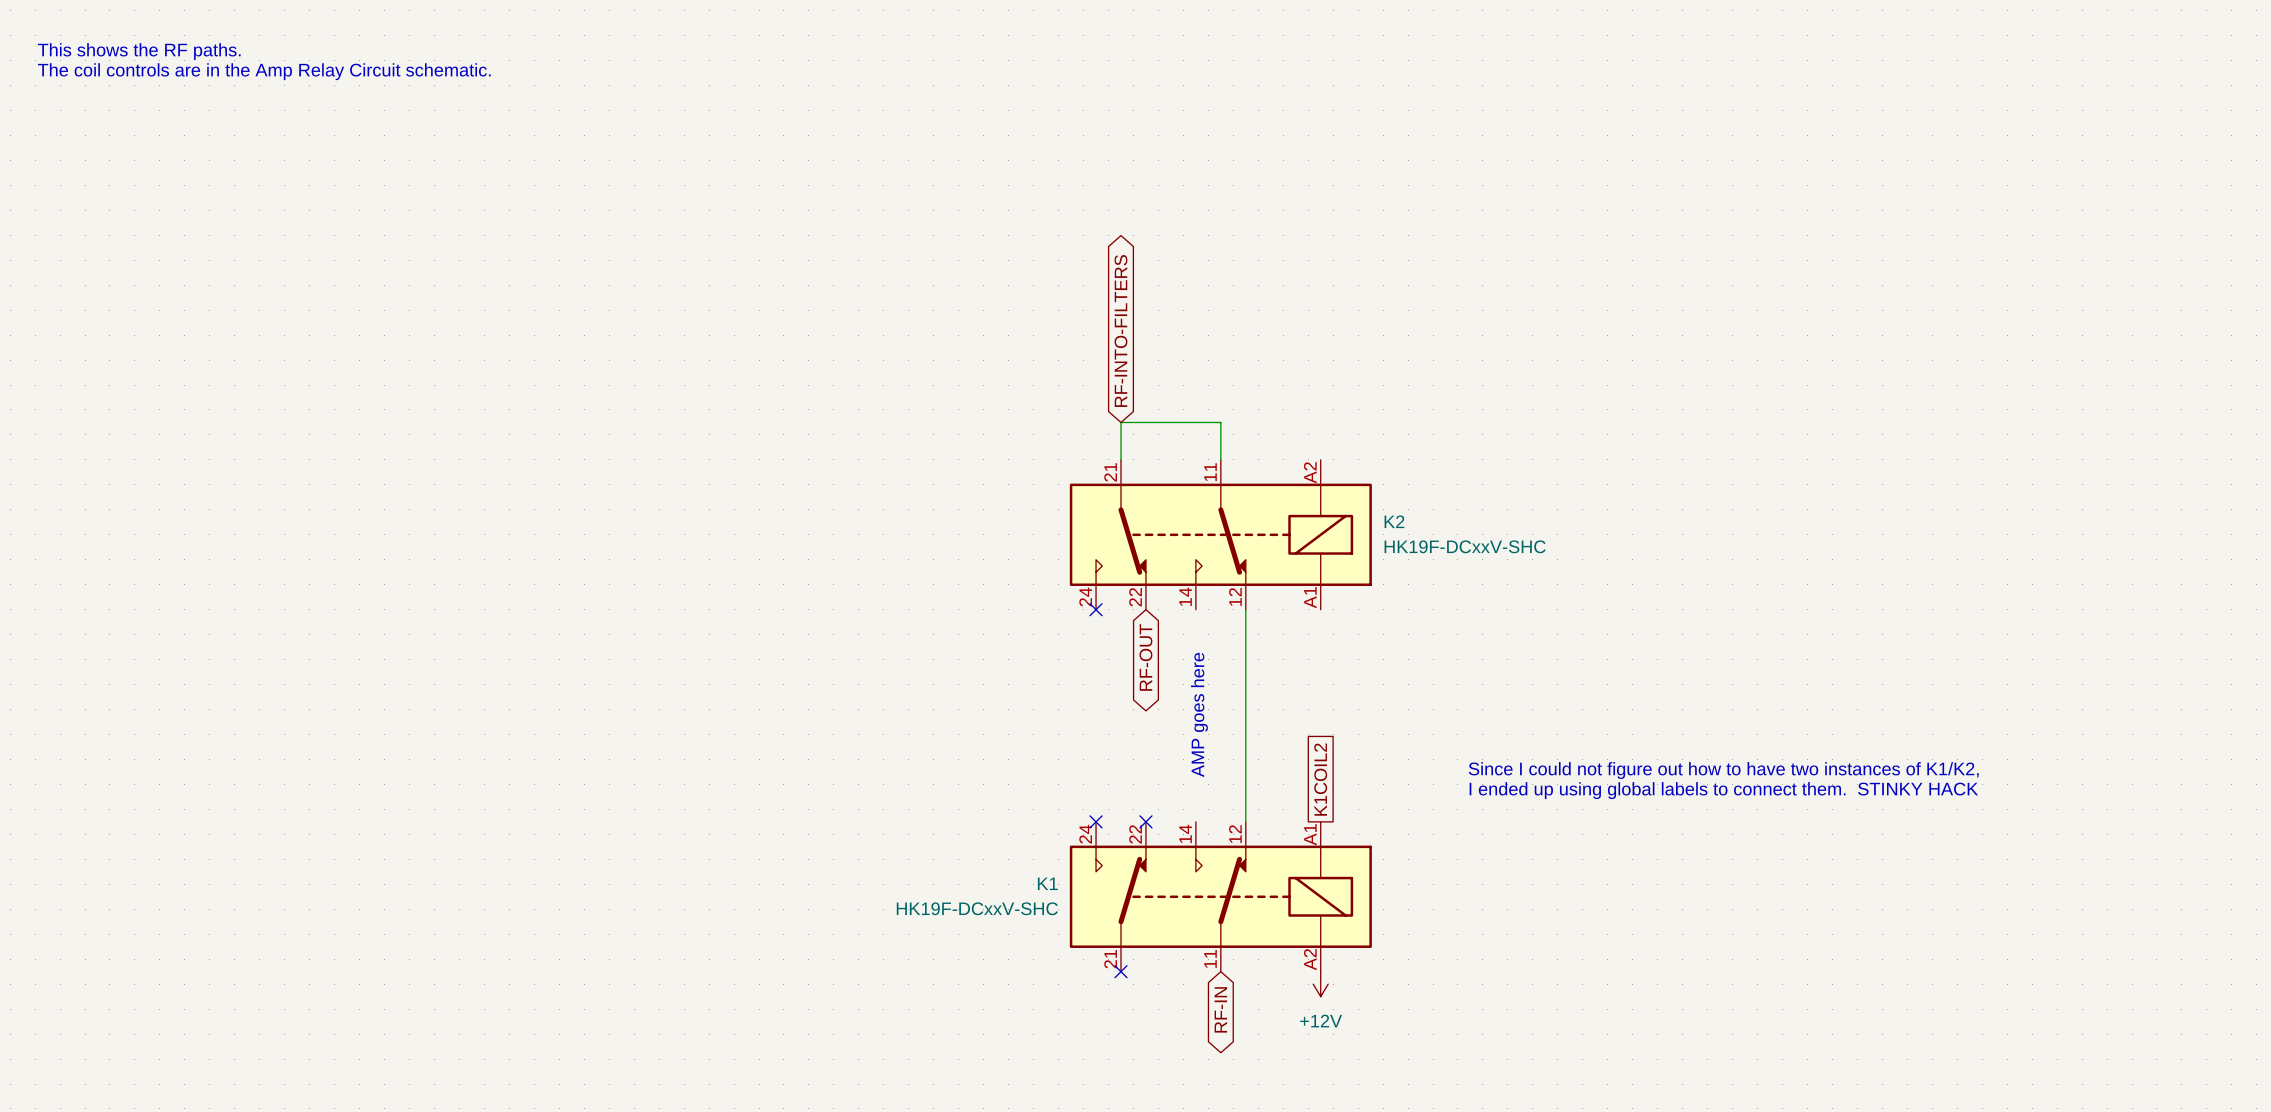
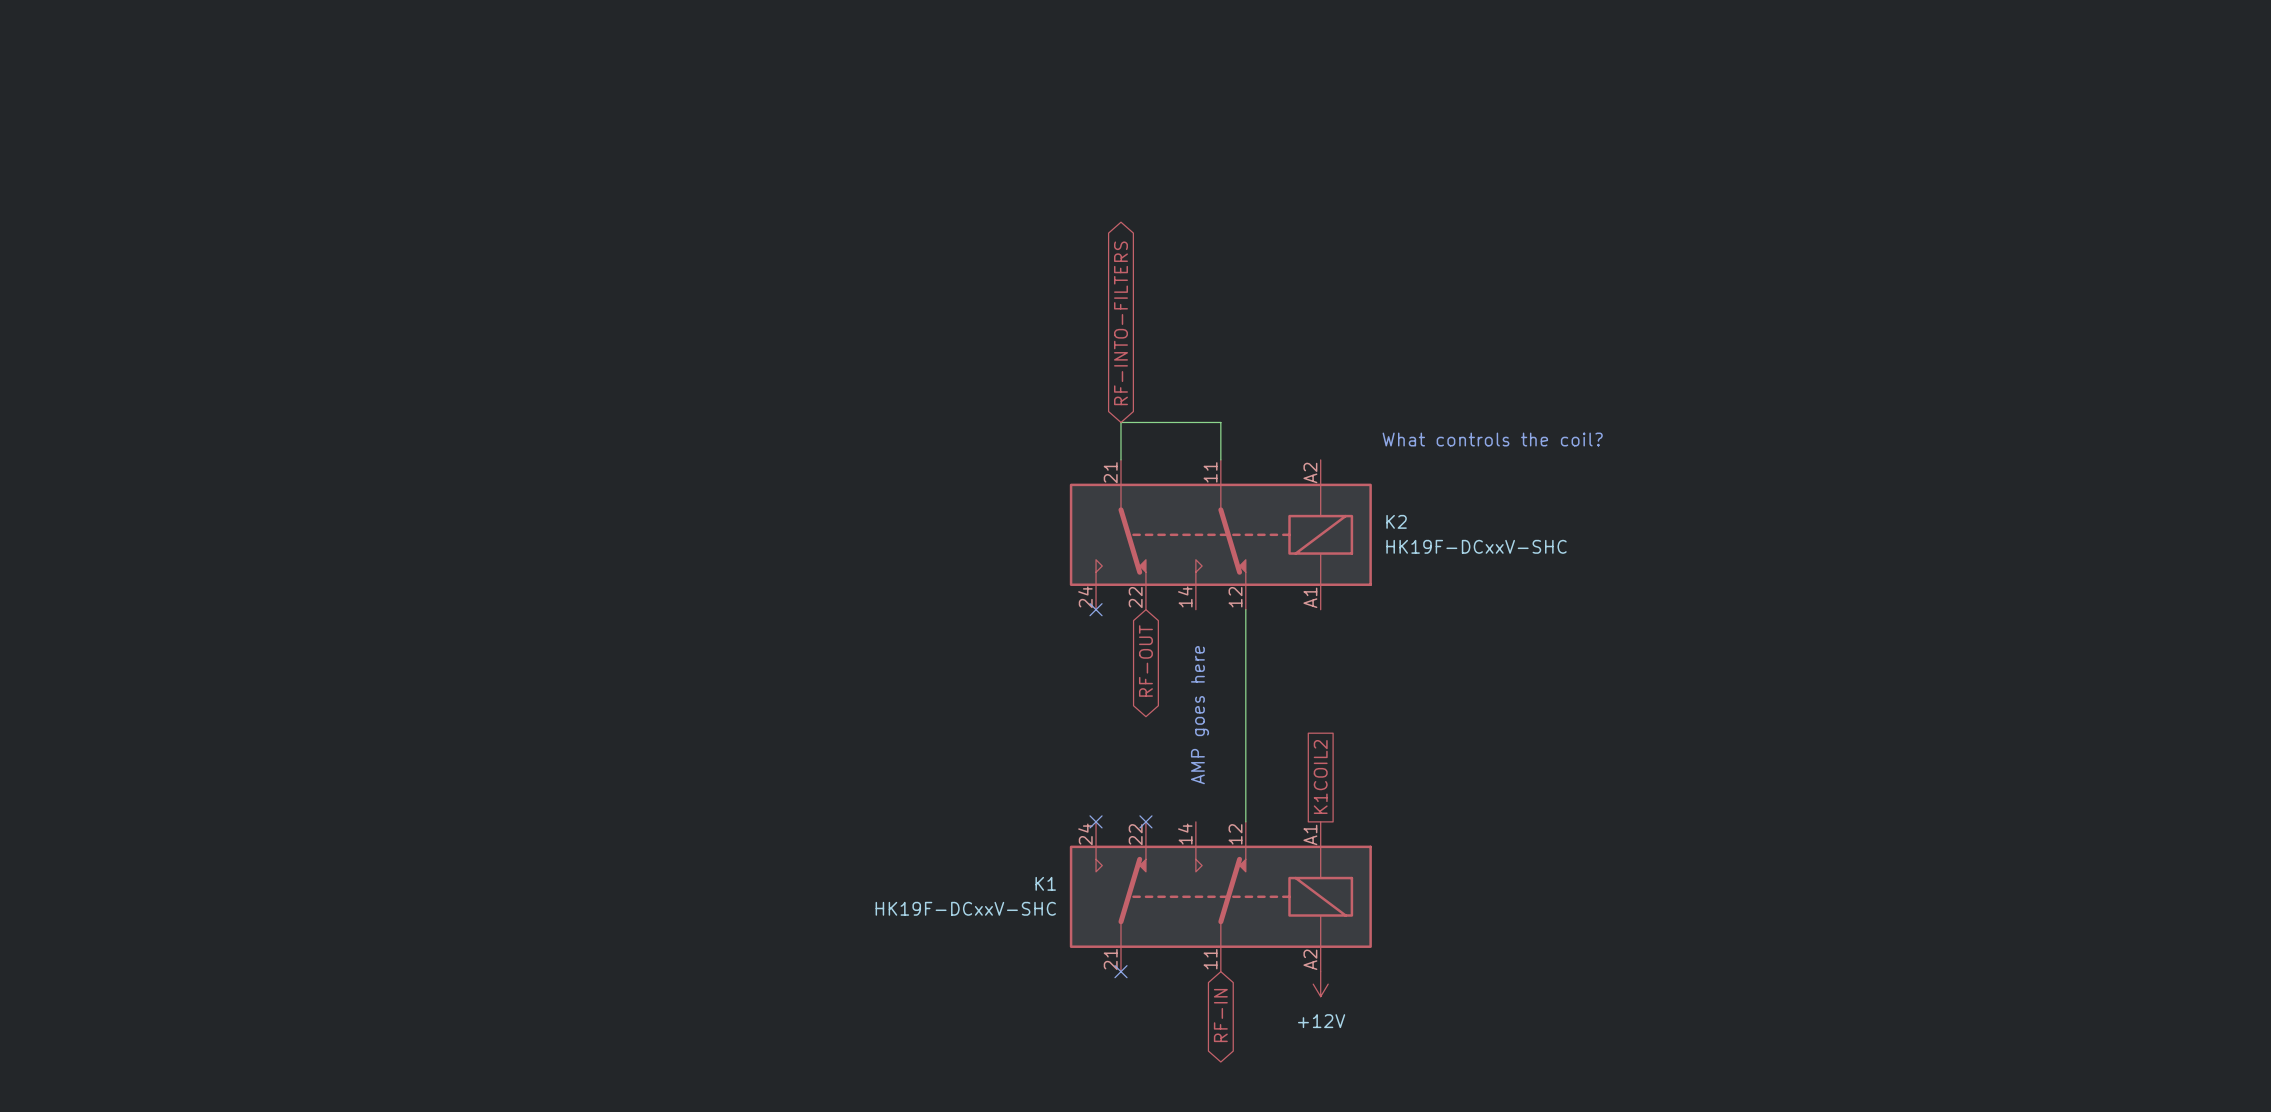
text: This shows the RF paths. (139, 51) -> none
text: The coil controls are in the Amp Relay Circuit schematic. (264, 71) -> none
text: none -> What controls the coil? (1492, 439)
text: Since I could not figure out how to have two instances of K1/K2, (1723, 770) -> none
text: I ended up using global labels to connect them. STINKY HACK (1723, 790) -> none

